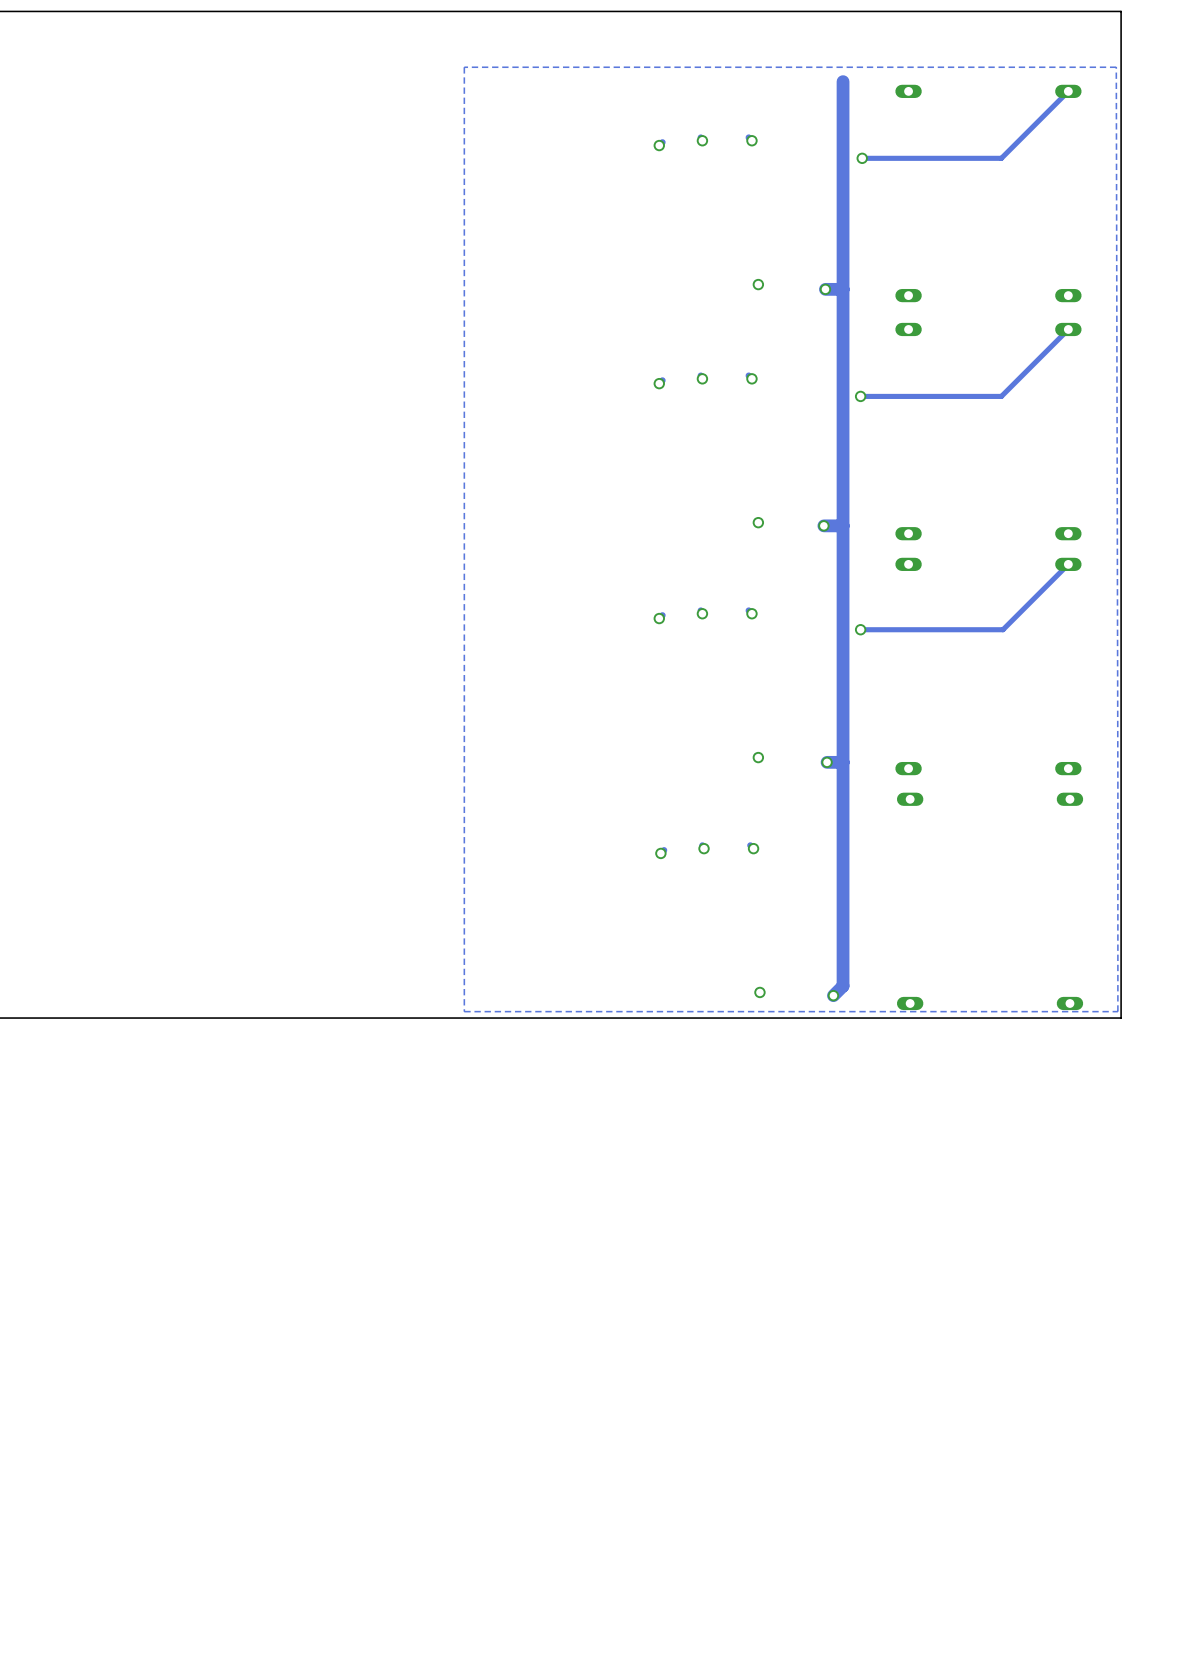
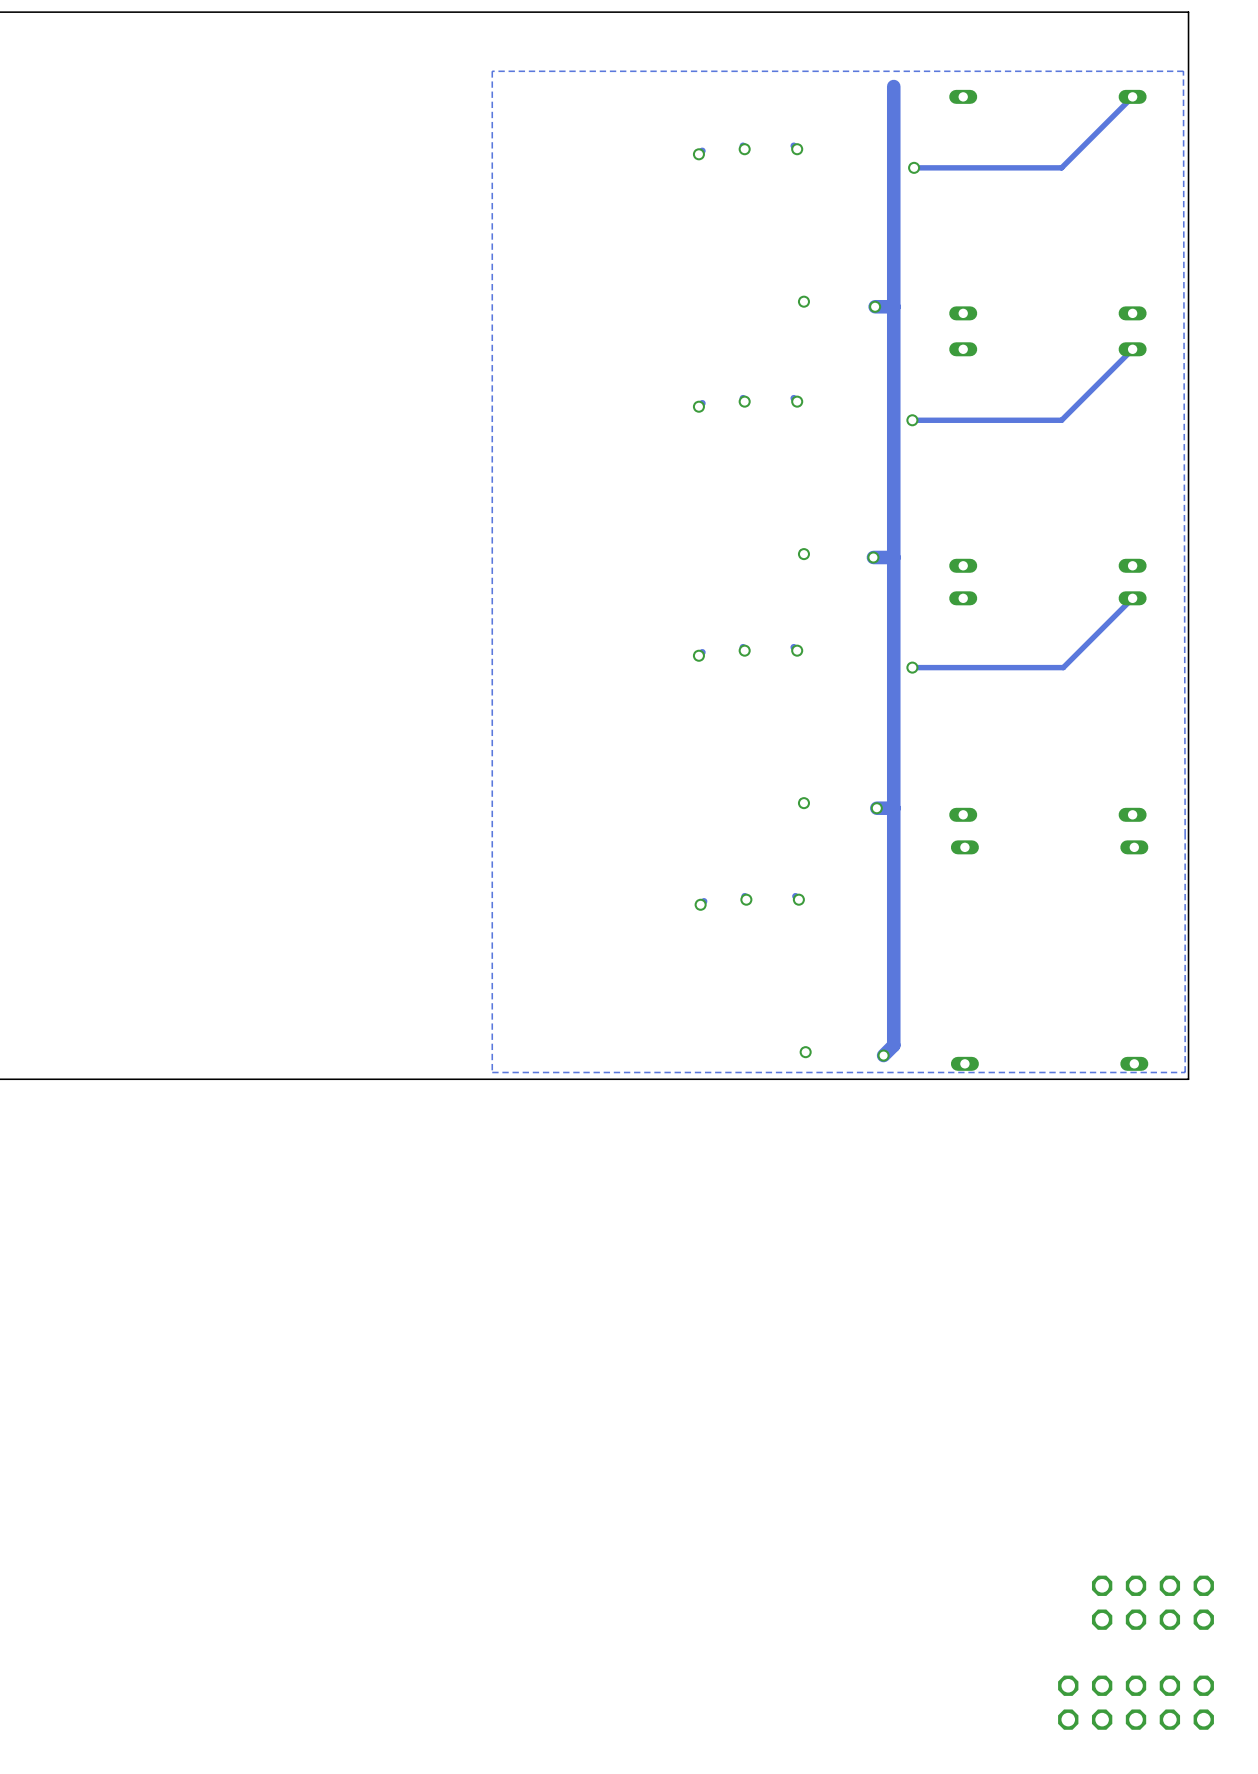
part: none -> (1152, 1602)
part: none -> (1136, 1702)

